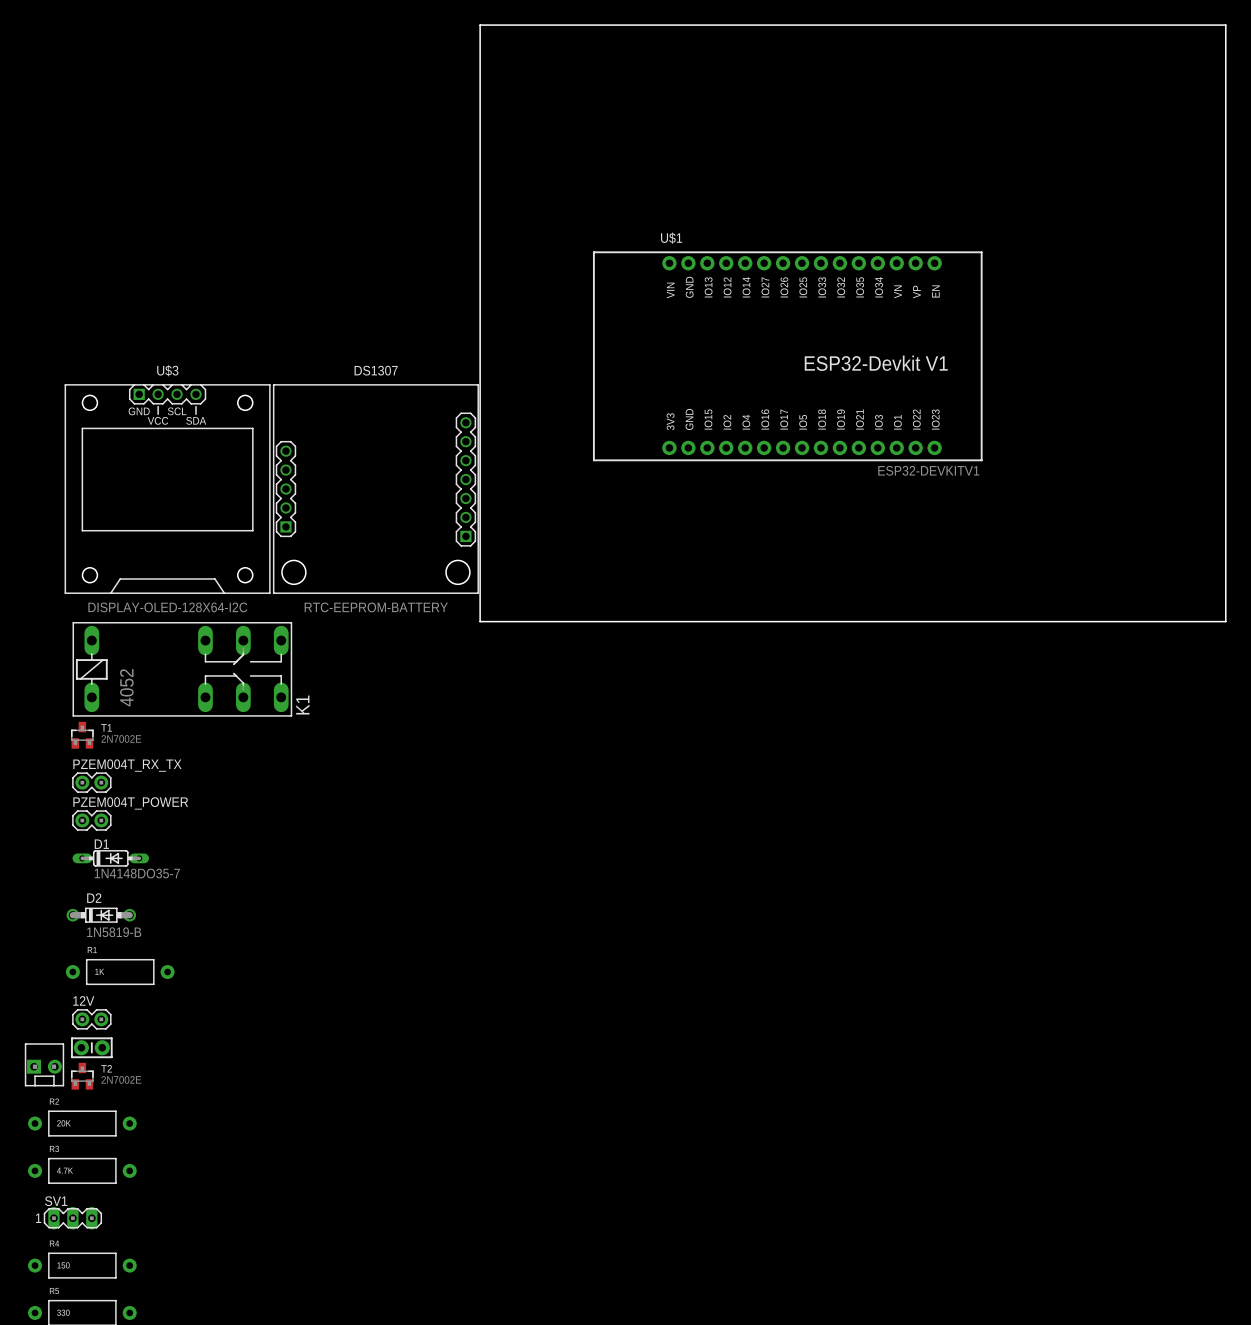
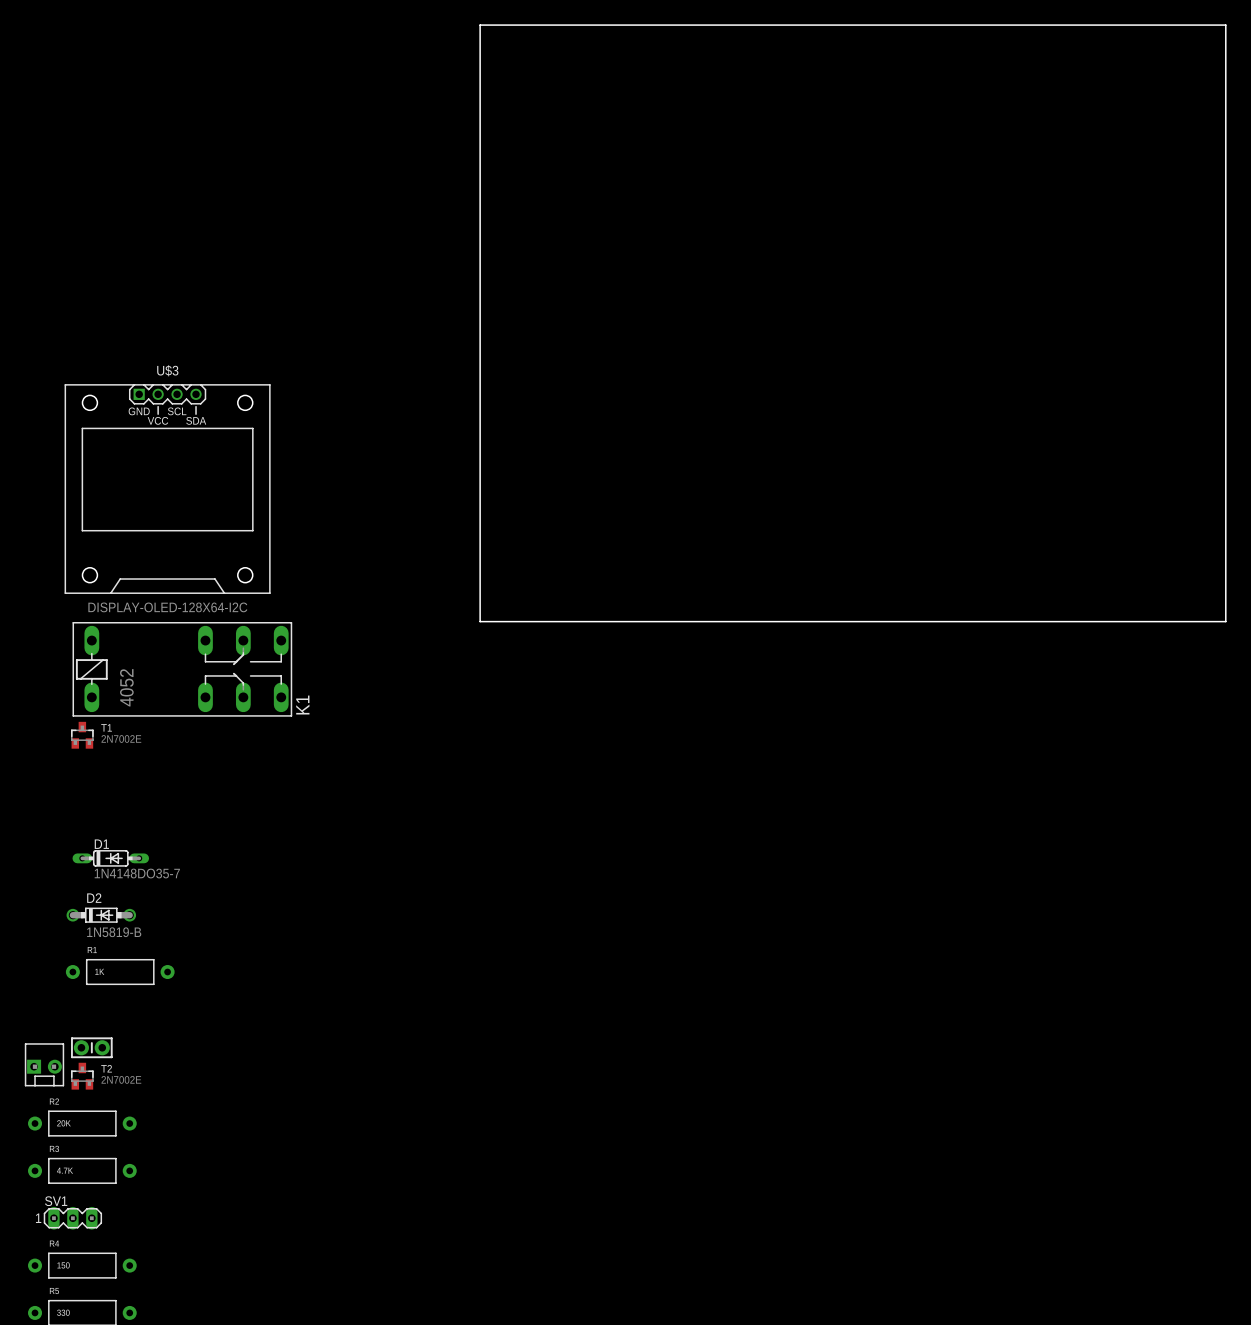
U$1: (787, 356) -> none
DS1307: RTC-EEPROM-BATTERY (375, 489) -> none
PZEM004T_RX_TX: (91, 782) -> none
PZEM004T_POWER: (91, 820) -> none
12V: (91, 1019) -> none

